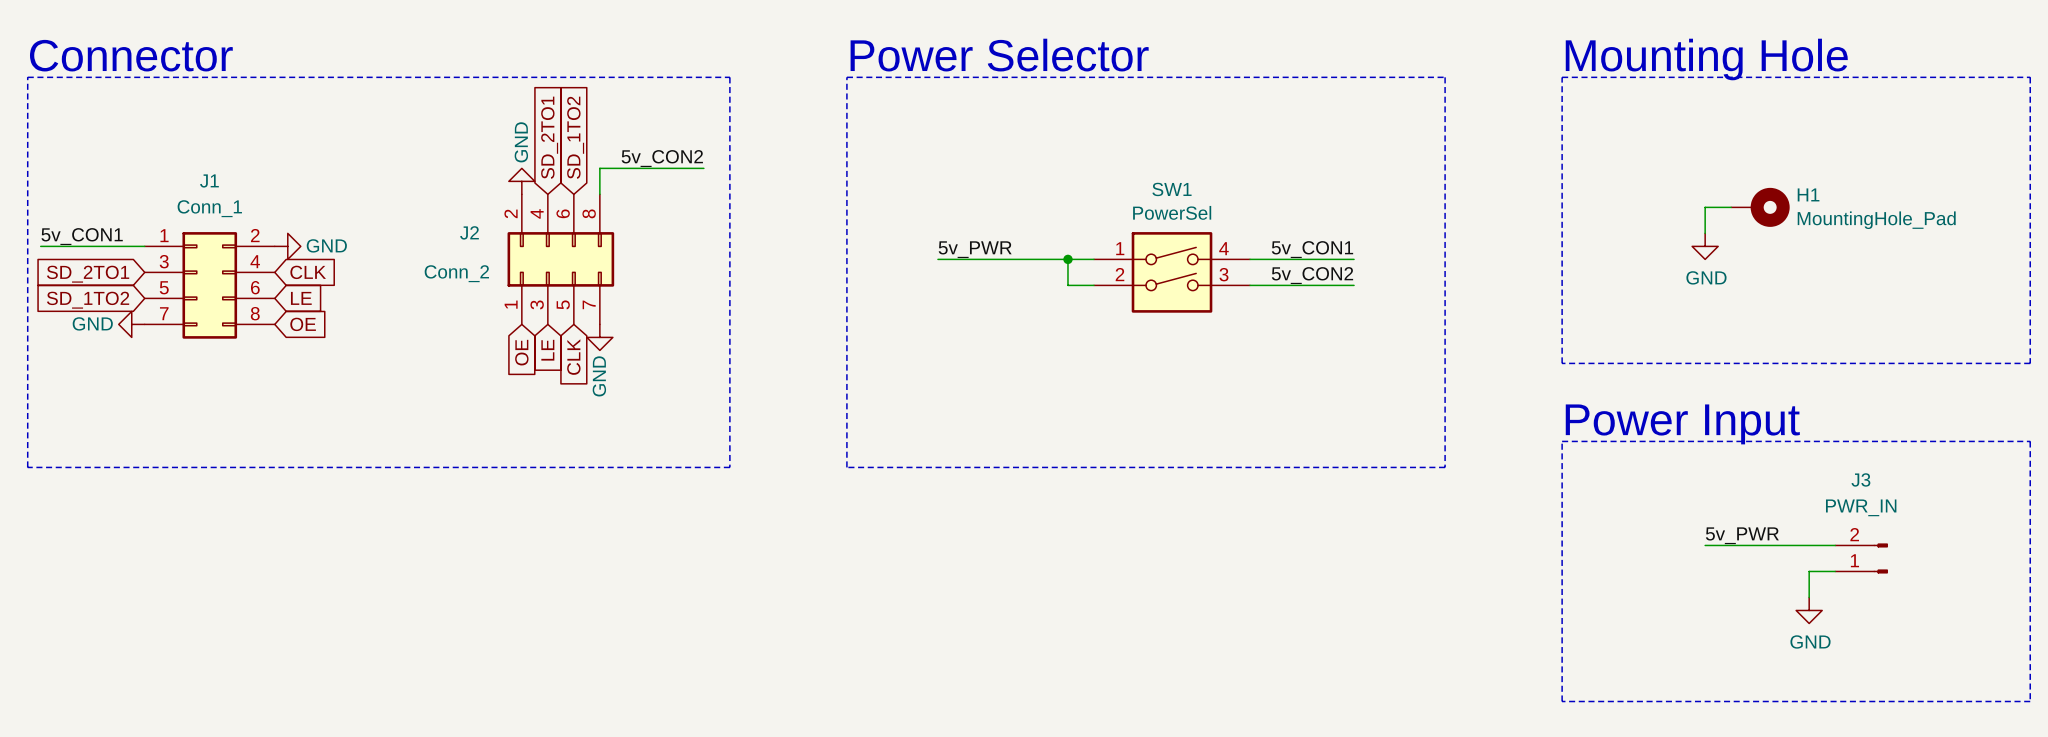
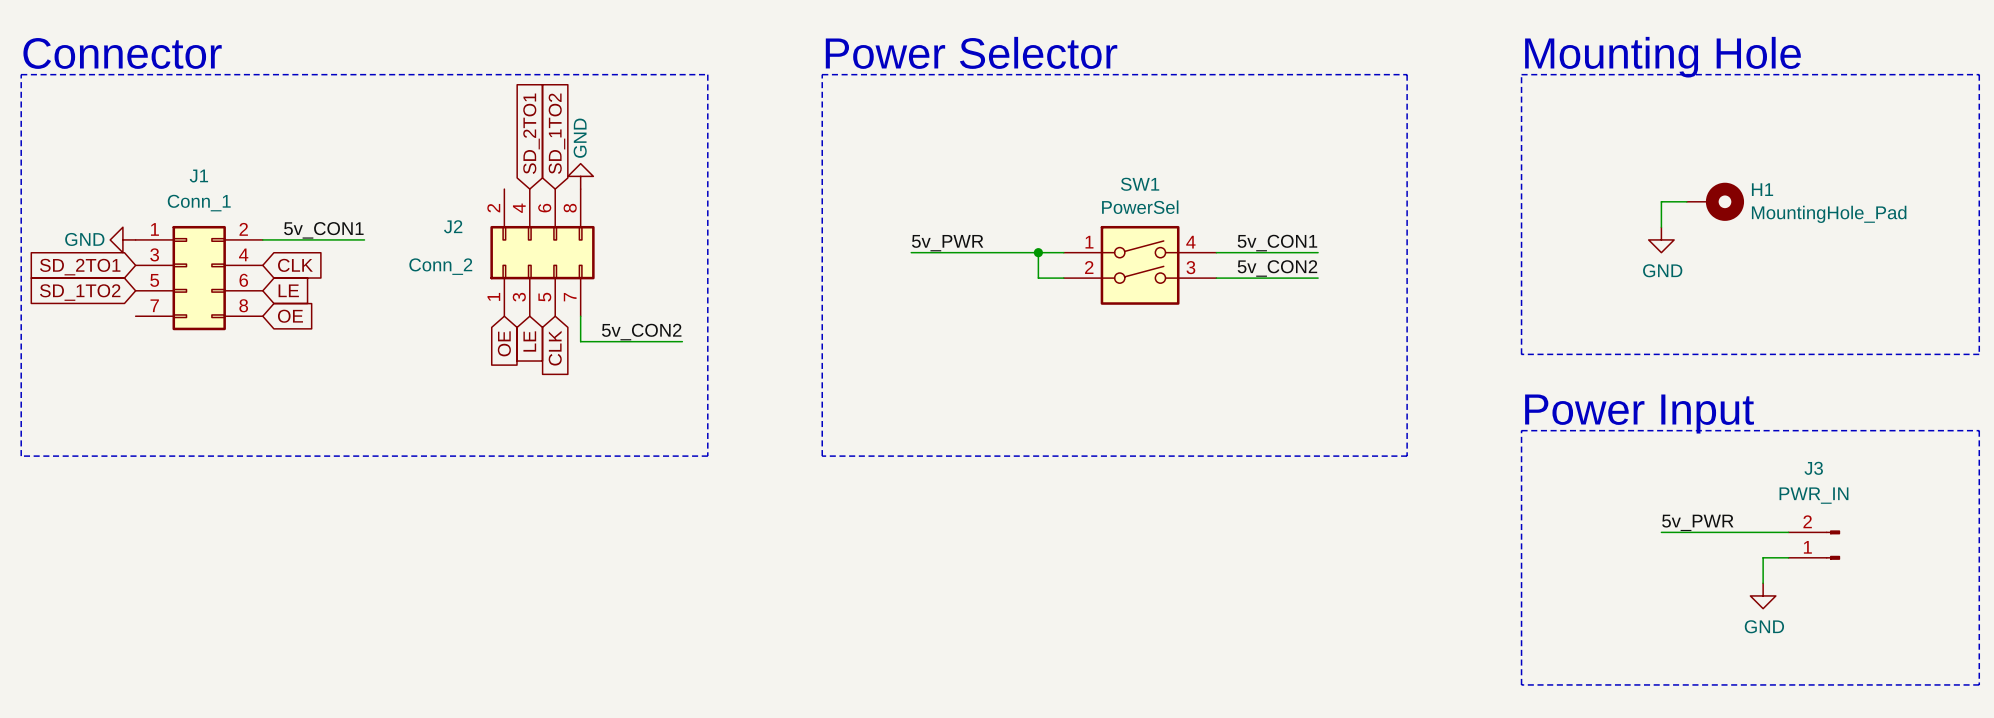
label position: 5v_CON2 (662, 158) -> 5v_CON2 (641, 332)
wire: (703, 168) (599, 168) (599, 194) -> none
power symbol: GND (521, 181) -> none
power symbol: none -> GND (580, 176)
label: 5v_CON1 (82, 236) -> none
label: none -> 5v_CON1 (323, 230)
wire: (40, 246) (144, 246) -> (262, 239) (364, 239)
power symbol: none -> GND (122, 239)
power symbol: GND (287, 246) -> none
power symbol: GND (131, 324) -> none
wire: none -> (580, 316) (580, 341) (682, 341)
power symbol: GND (599, 337) -> none

